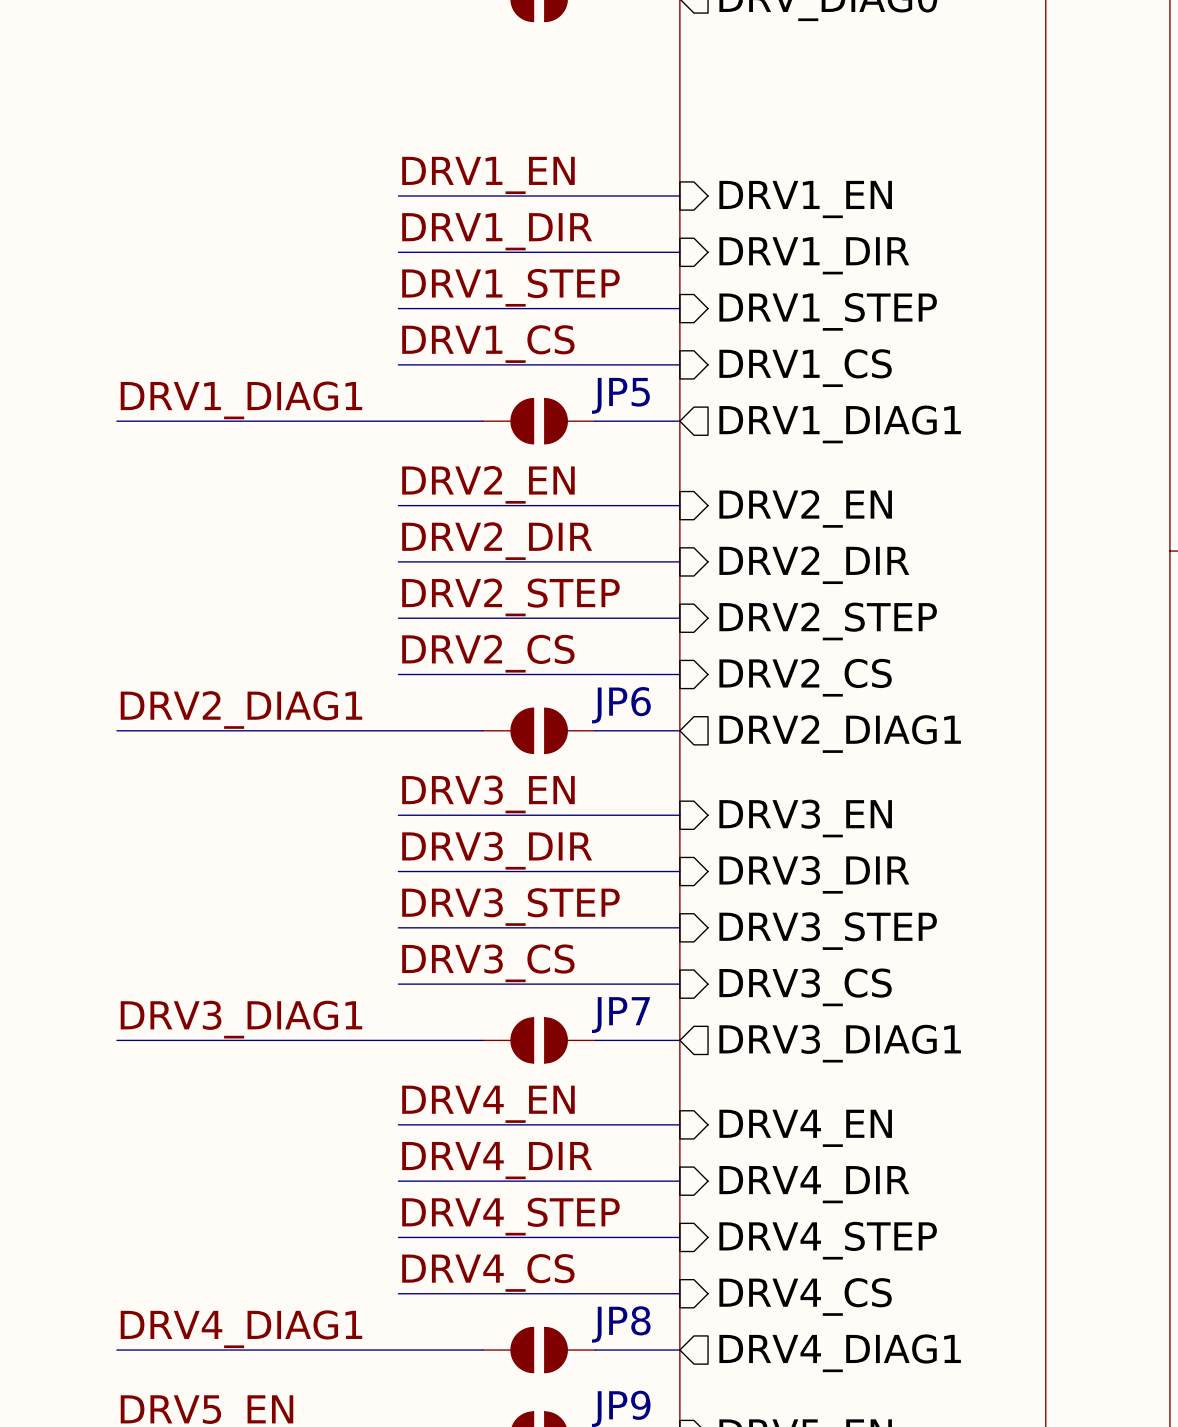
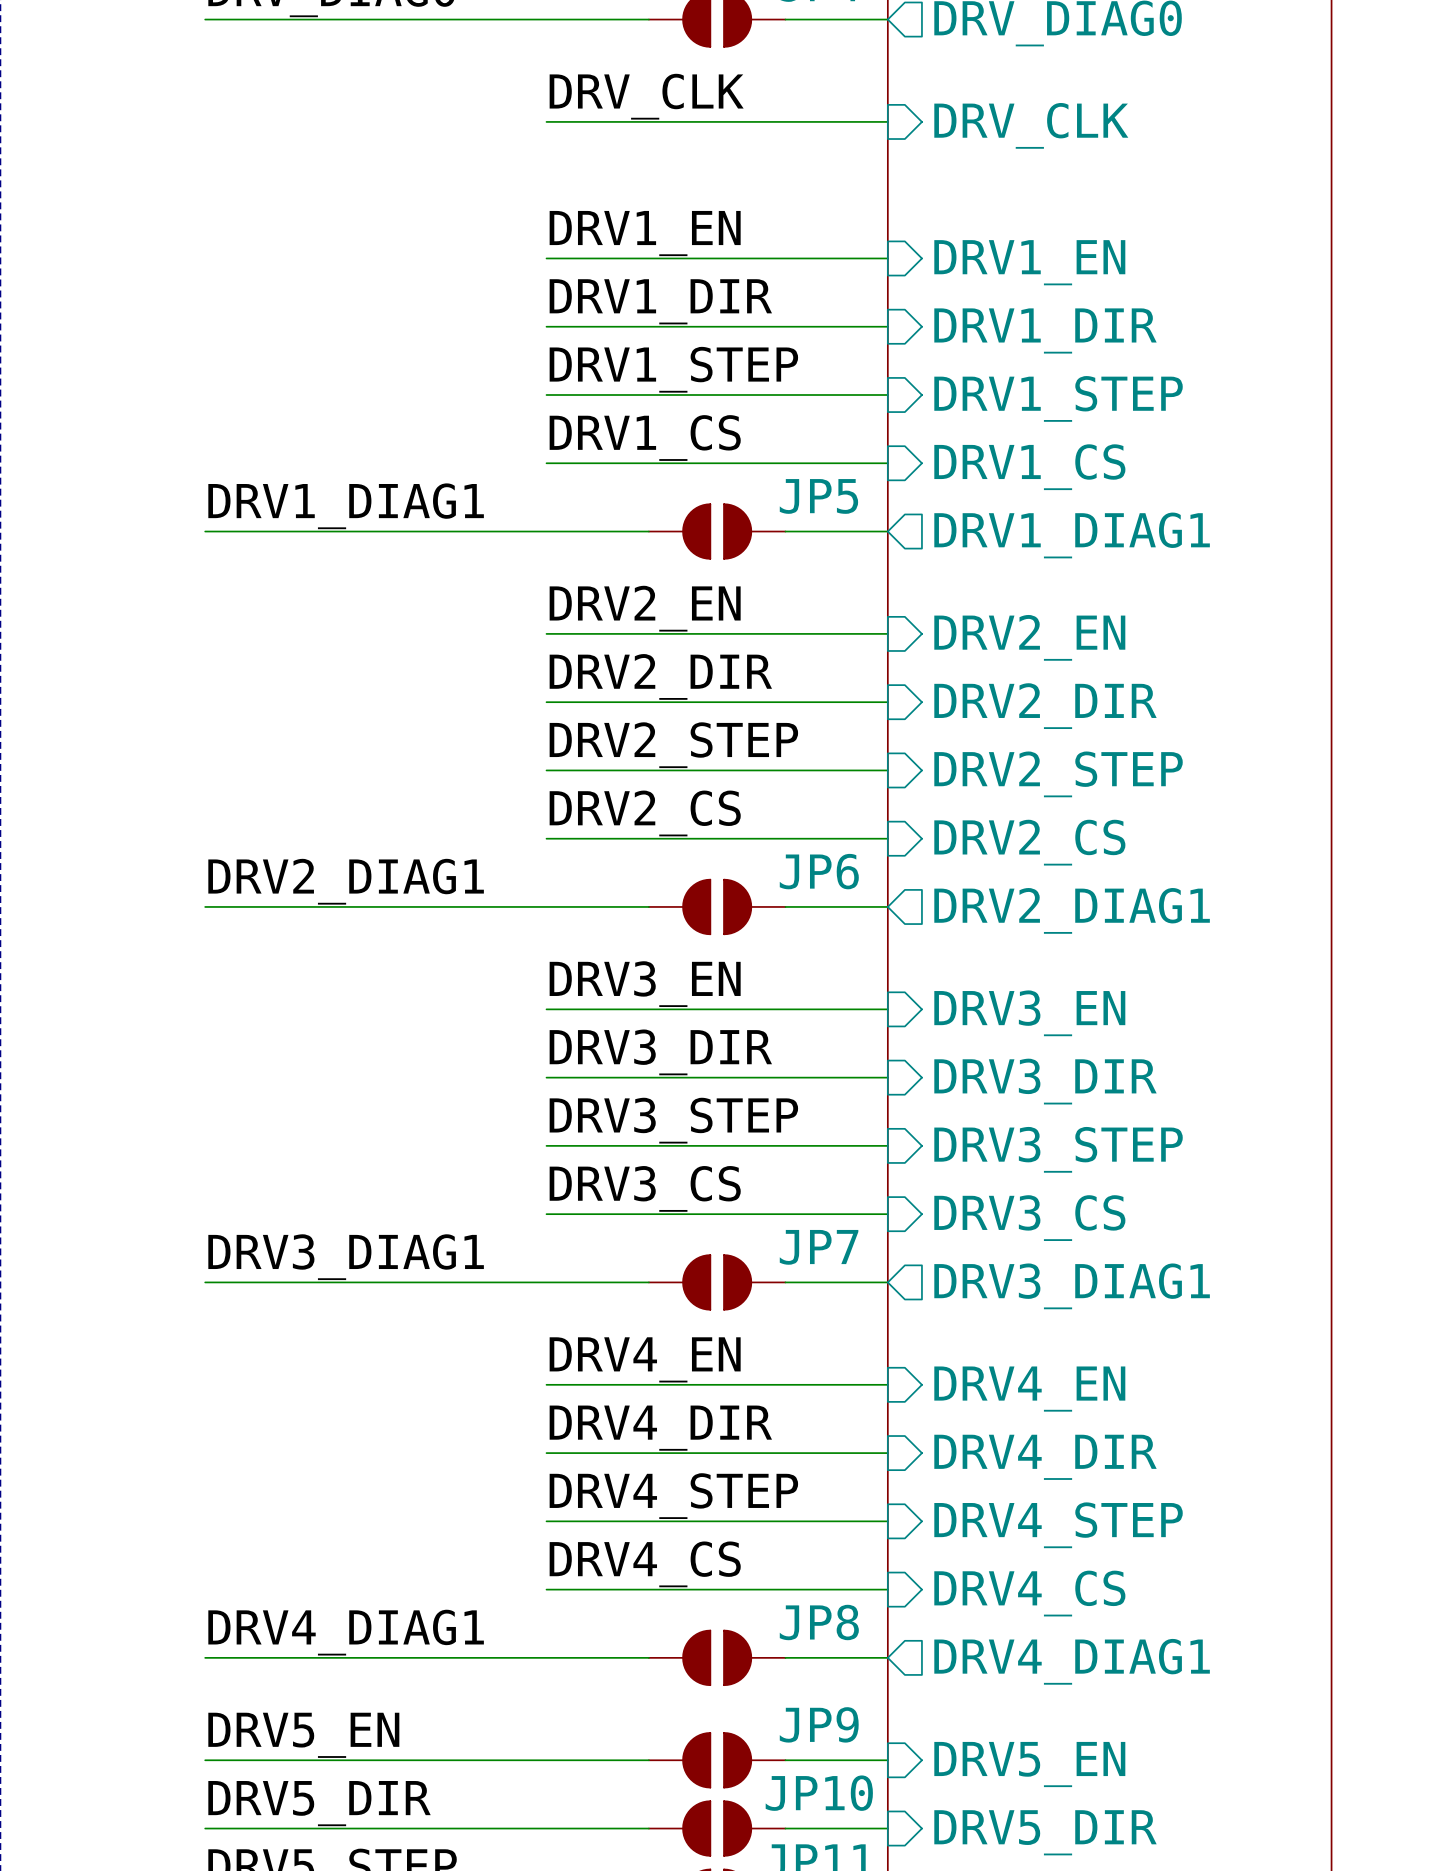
label: none -> DRV_CLK (646, 96)
wire: none -> (546, 121) (887, 121)
sheet pin: none -> DRV_CLK (1031, 125)

